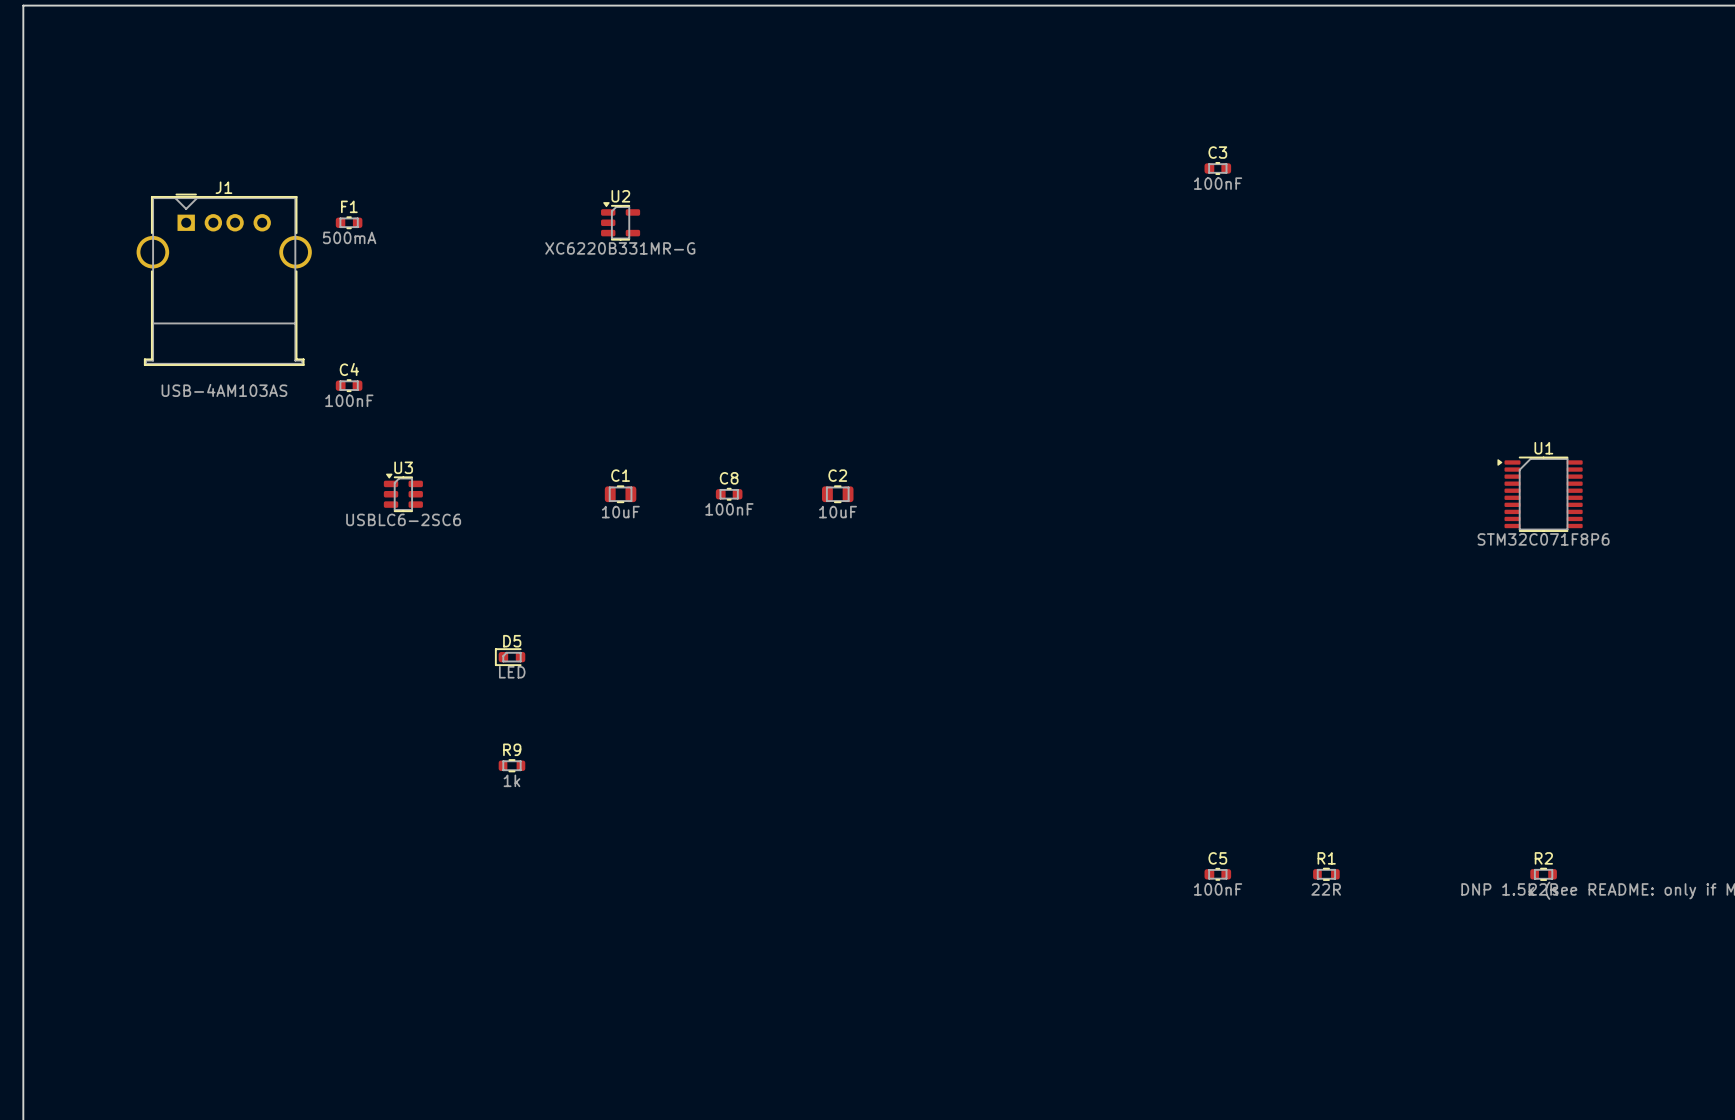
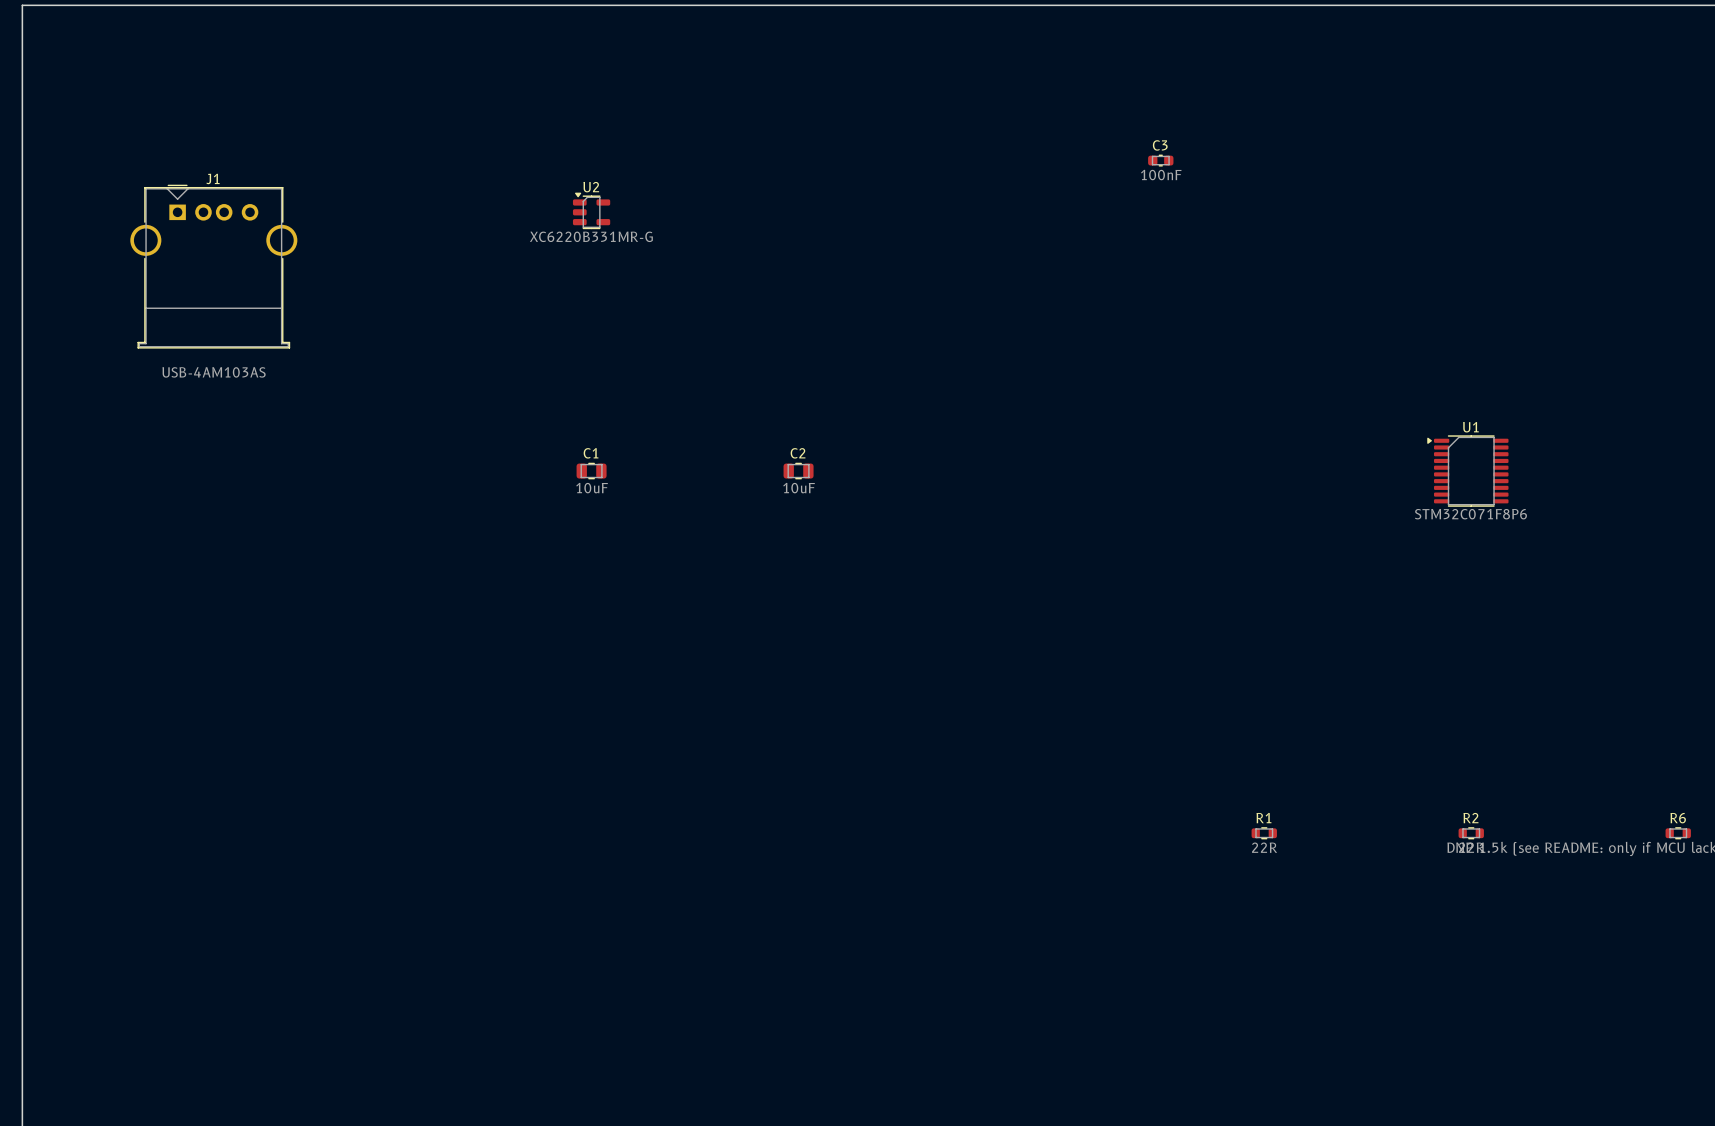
F1: 500mA (349, 222) -> none
C4: 100nF (349, 385) -> none
U3: USBLC6-2SC6 (403, 492) -> none
C8: 100nF (729, 494) -> none
D5: LED (510, 657) -> none
R9: 1k (511, 765) -> none
C5: 100nF (1217, 874) -> none

